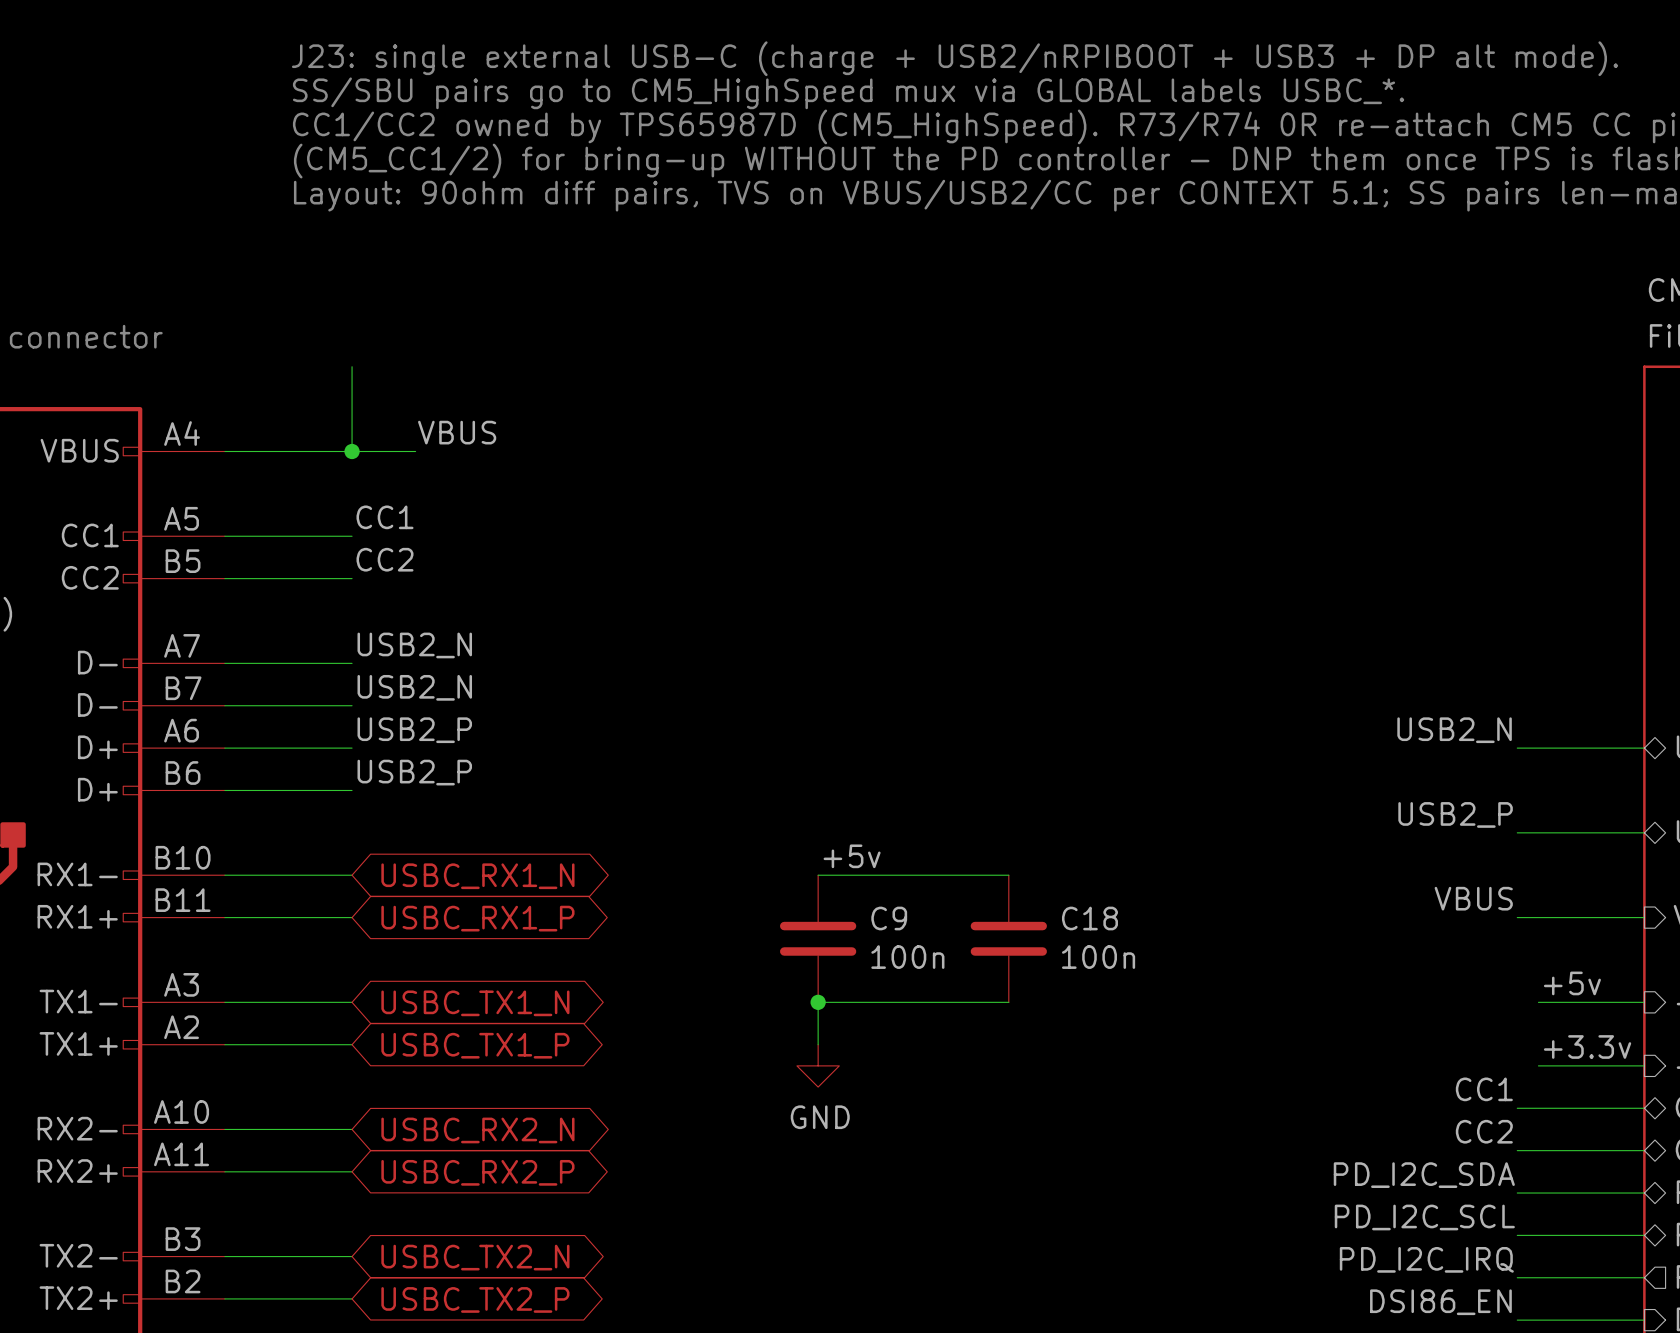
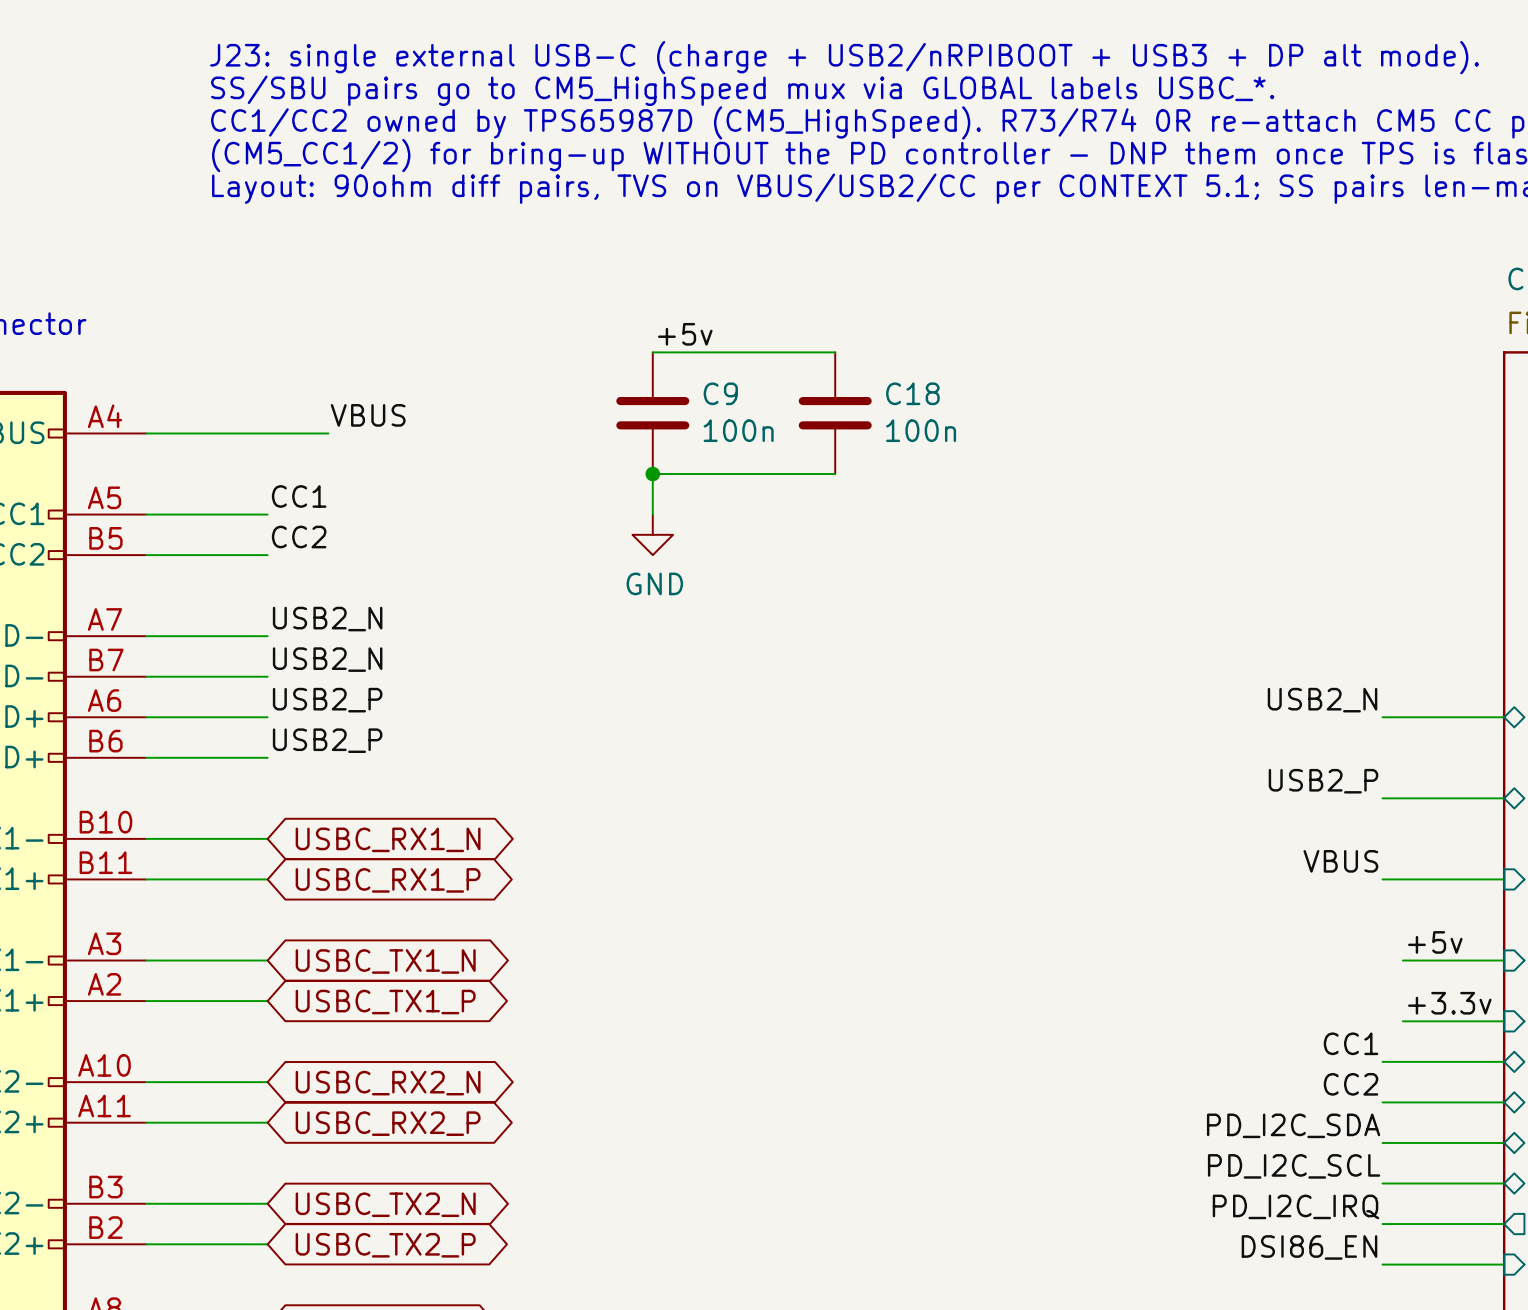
label: none -> +5v (685, 334)
wire: (352, 366) (352, 451) -> none
wire: none -> (652, 352) (835, 352)
junction: (352, 451) -> none
junction: none -> (652, 474)
wire: none -> (835, 474) (652, 474) (652, 514)
power symbol: none -> GND (652, 534)
label: +5v (852, 856) -> none
wire: (818, 875) (1008, 875) -> none
C9 position: (818, 938) -> (652, 413)
C18 position: (1008, 938) -> (835, 413)
junction: (818, 1002) -> none
wire: (1008, 1002) (818, 1002) (818, 1044) -> none
power symbol: GND (818, 1065) -> none

